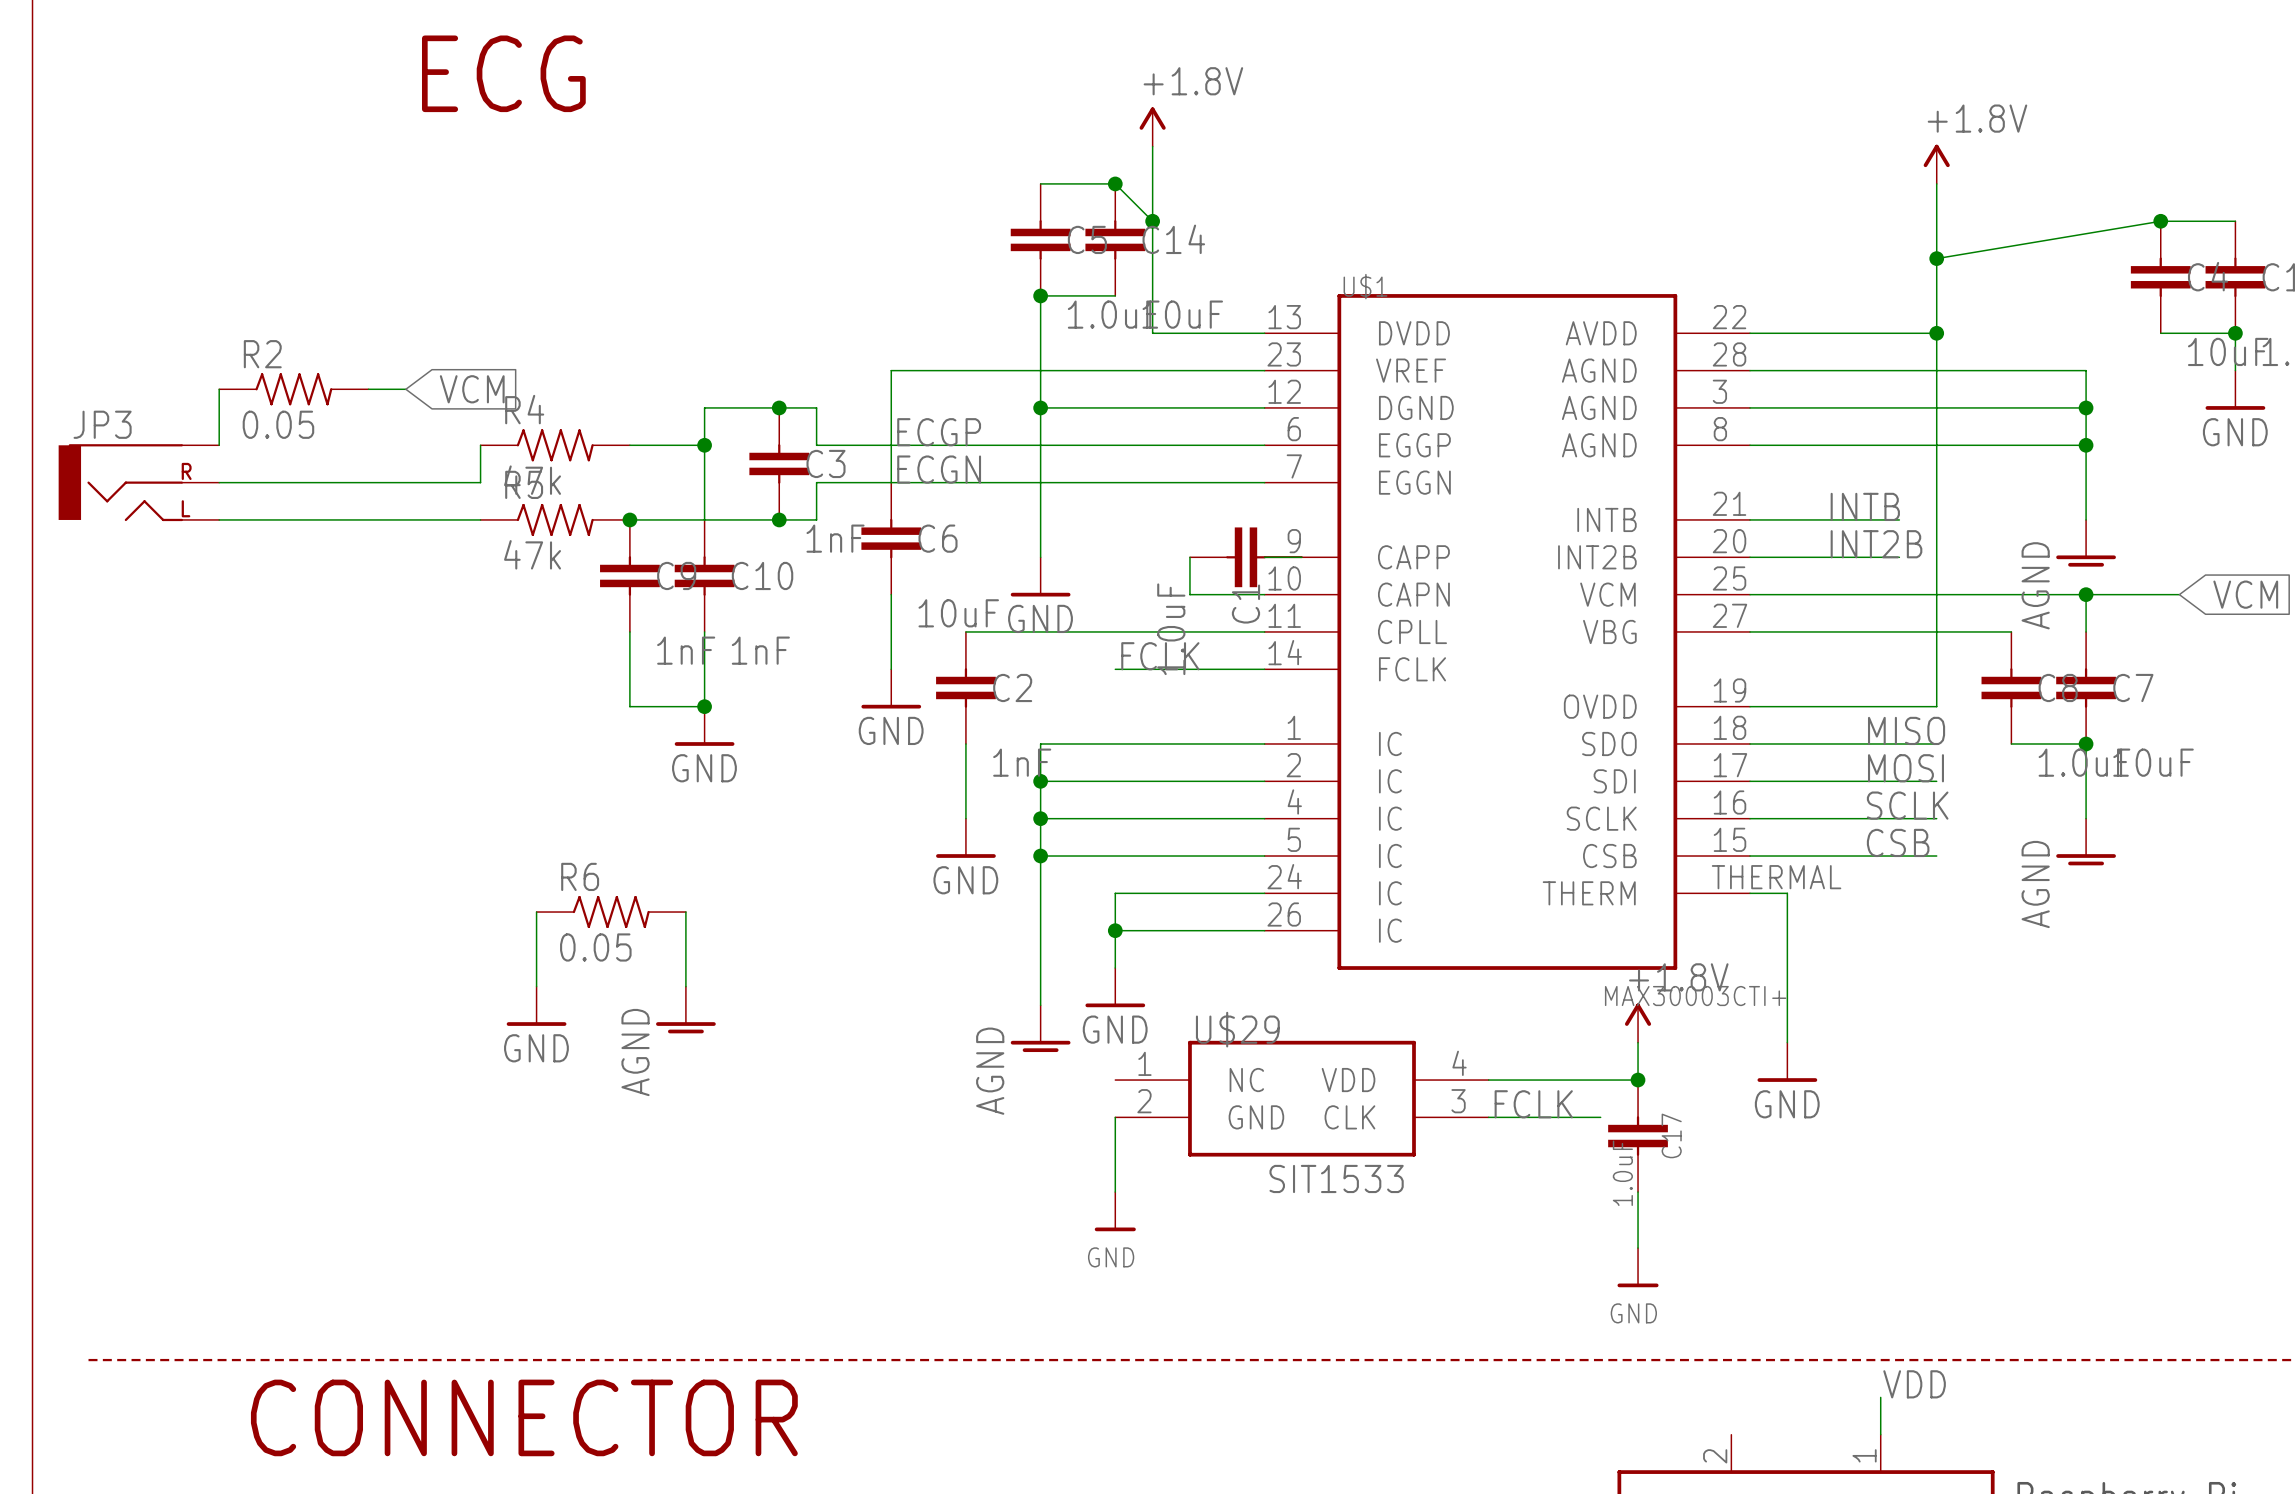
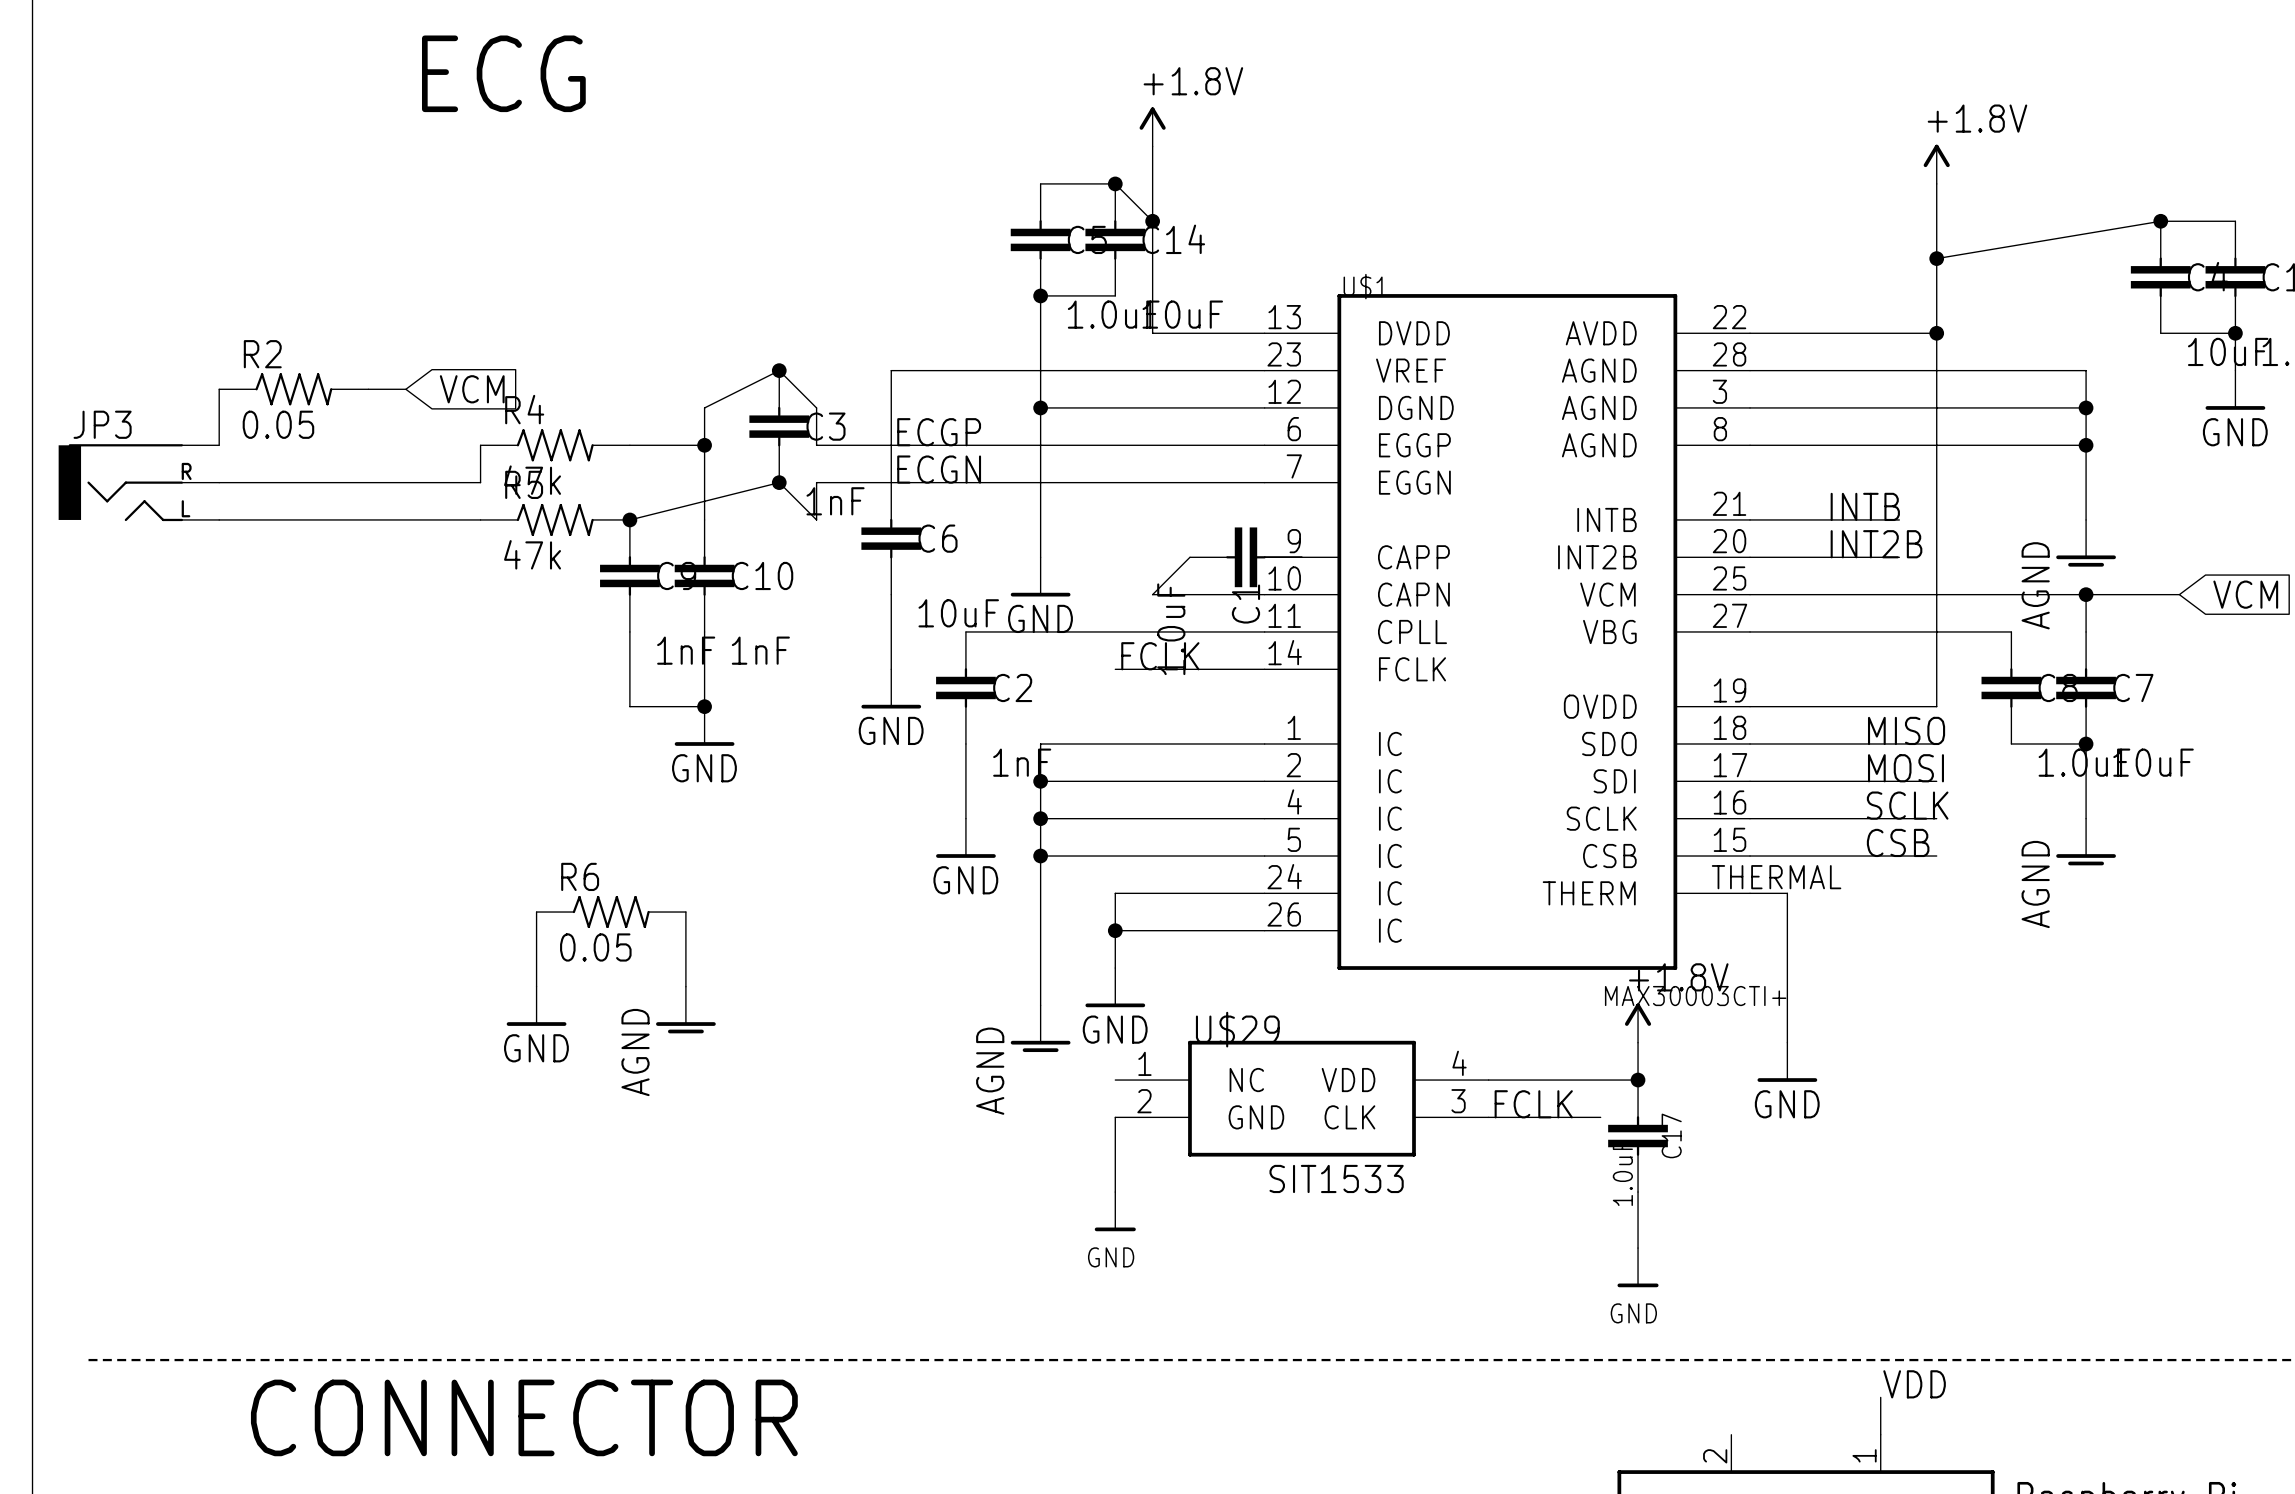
junction: none -> (779, 370)
wire: (704, 407) (816, 407) -> (704, 407) (779, 370) (816, 407)
junction: (779, 407) -> none
C3 position: (779, 463) -> (779, 426)
junction: none -> (779, 482)
wire: (629, 519) (816, 519) -> (629, 519) (779, 482) (816, 519)
junction: (779, 519) -> none
wire: (1189, 557) (1189, 594) -> (1189, 557) (1152, 594) (1189, 594)

